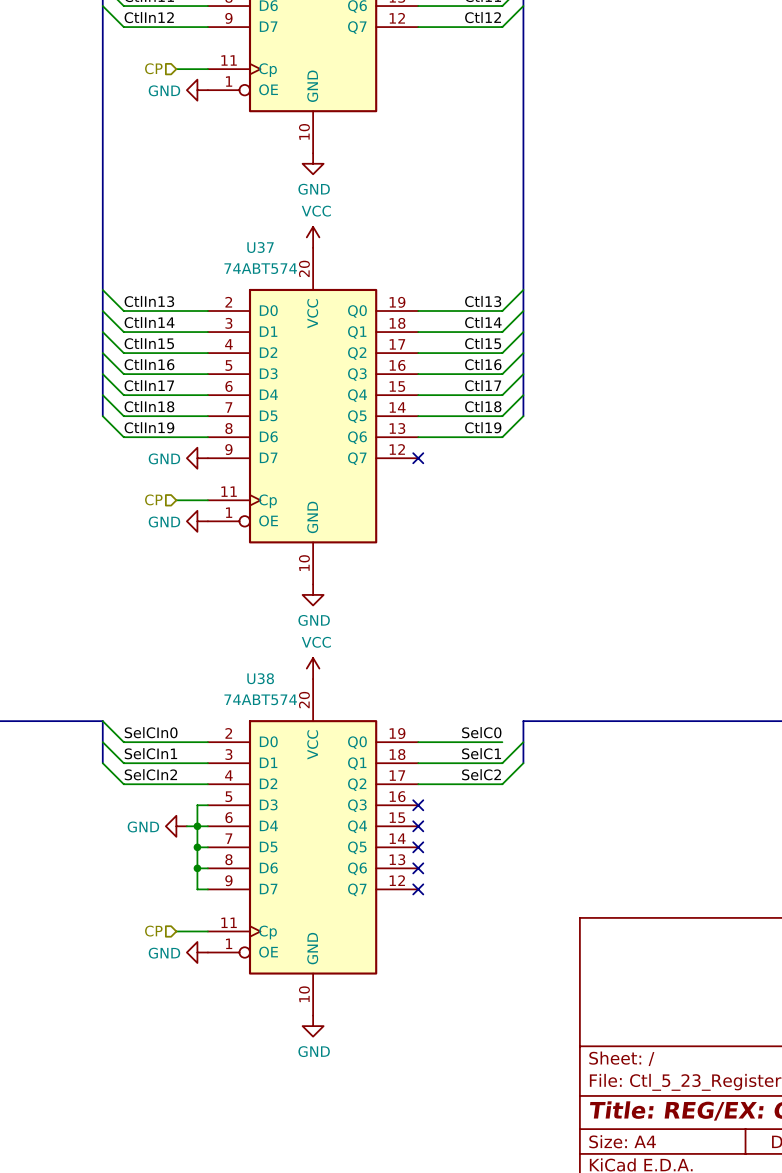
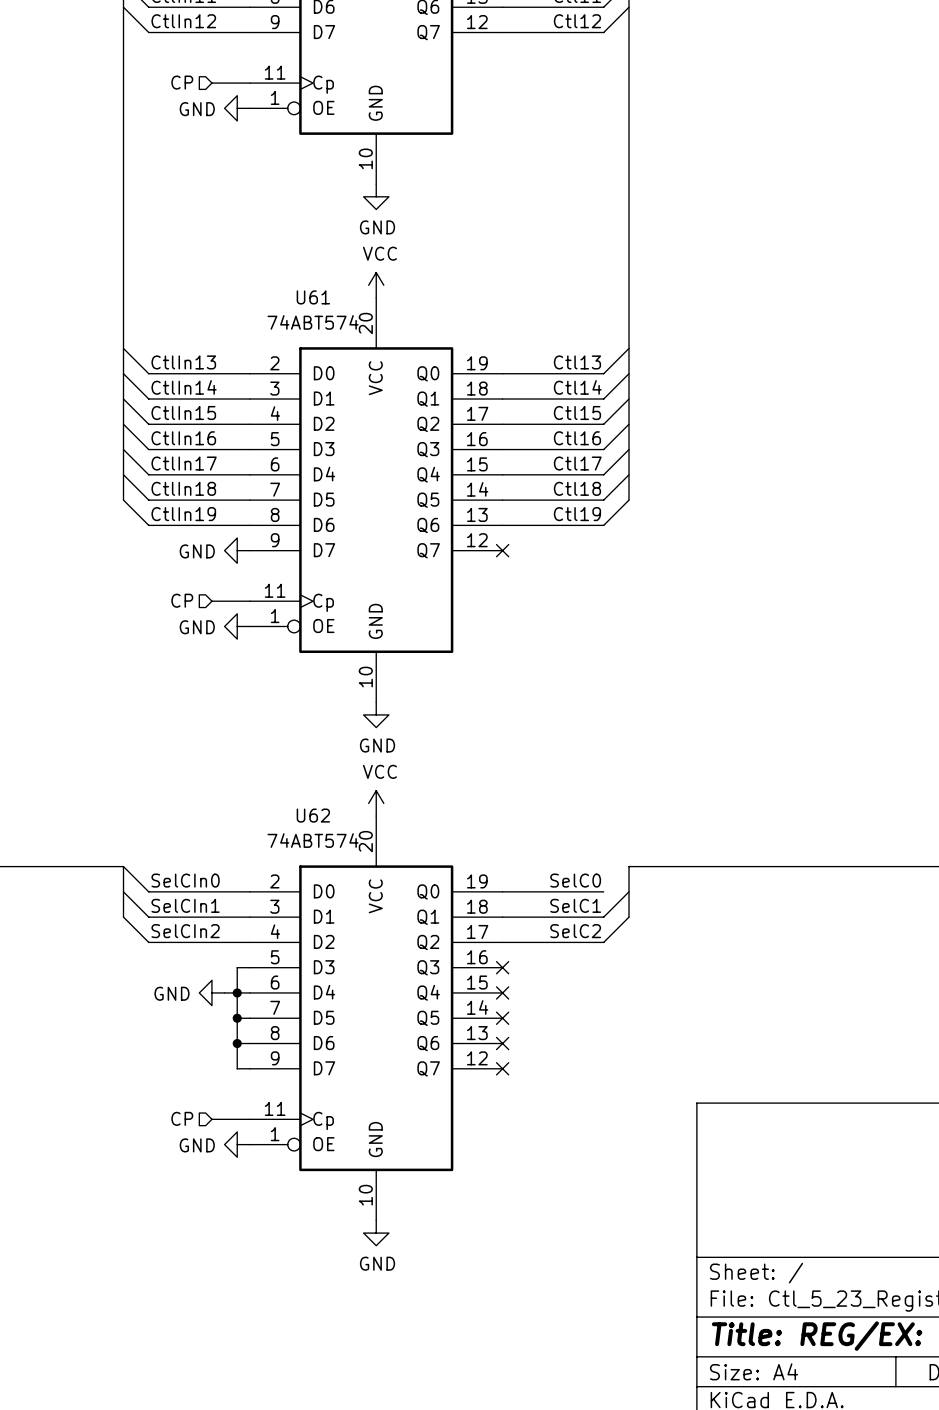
U37 name: U37 (260, 247) -> U61 (313, 297)
U38 name: U38 (260, 678) -> U62 (313, 815)

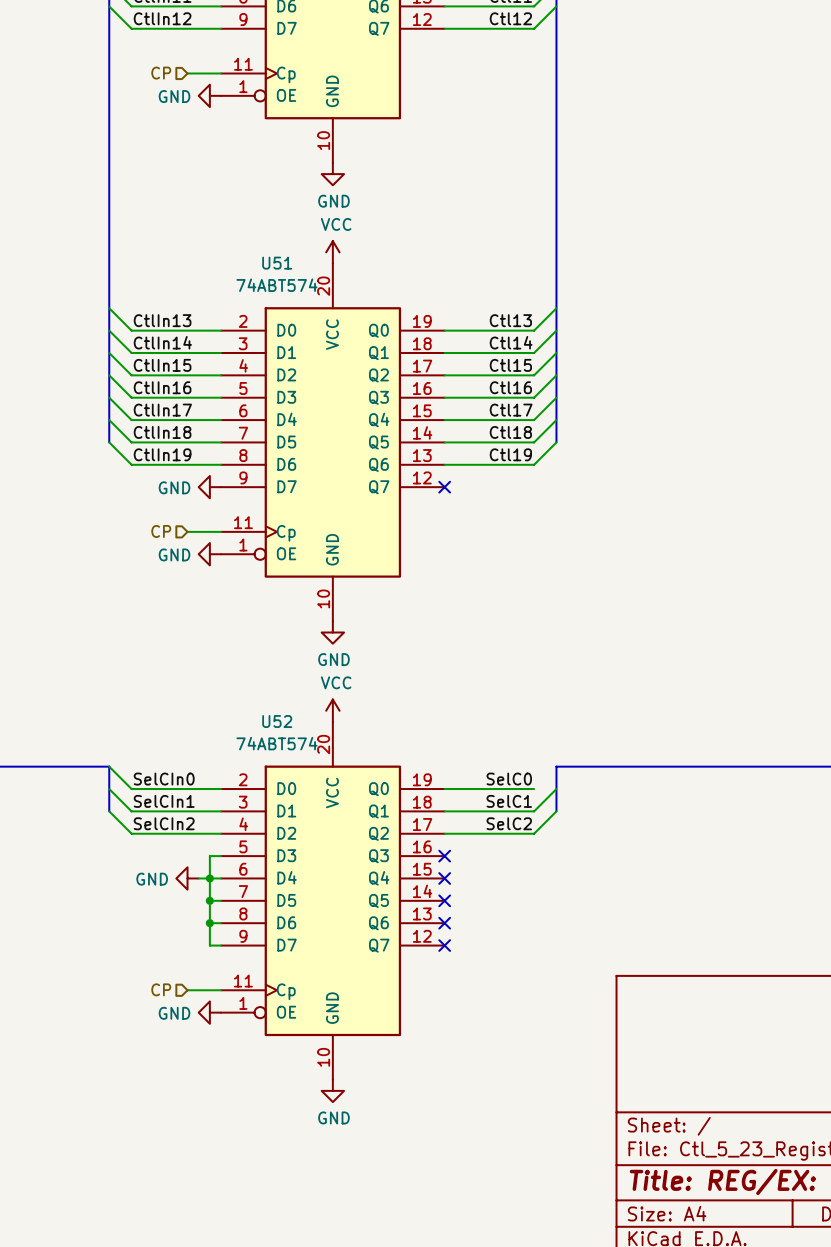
U61 name: U61 (313, 297) -> U51 (277, 263)
U62 name: U62 (313, 815) -> U52 (277, 721)

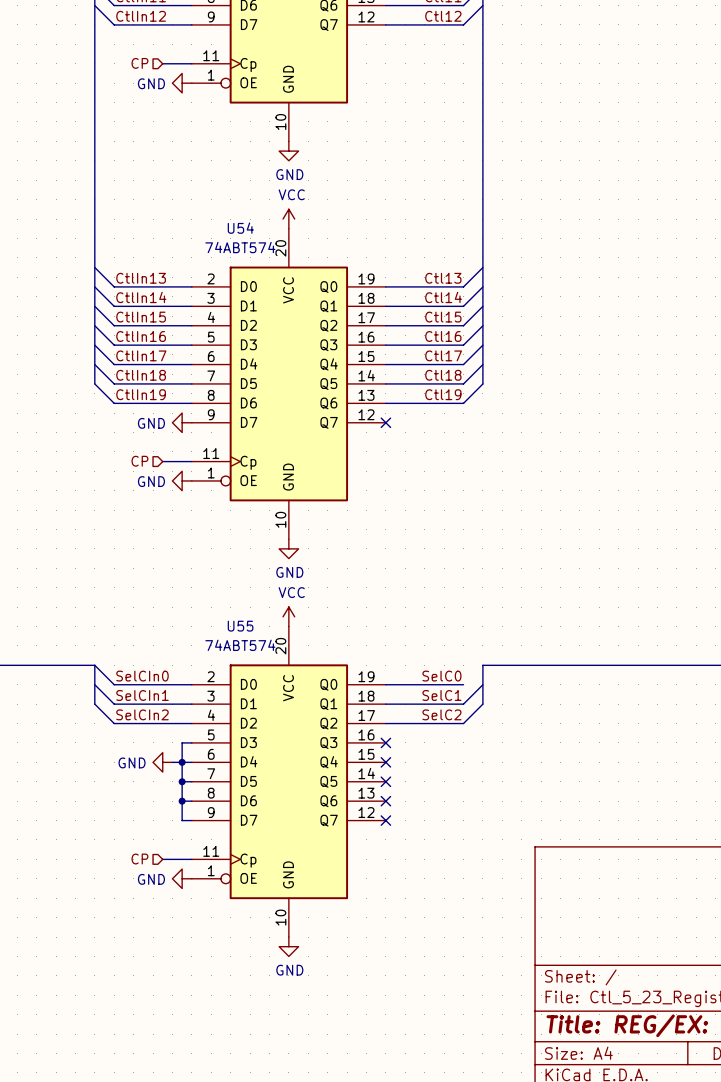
U51 name: U51 (277, 263) -> U54 (240, 228)
U52 name: U52 (277, 721) -> U55 (240, 626)

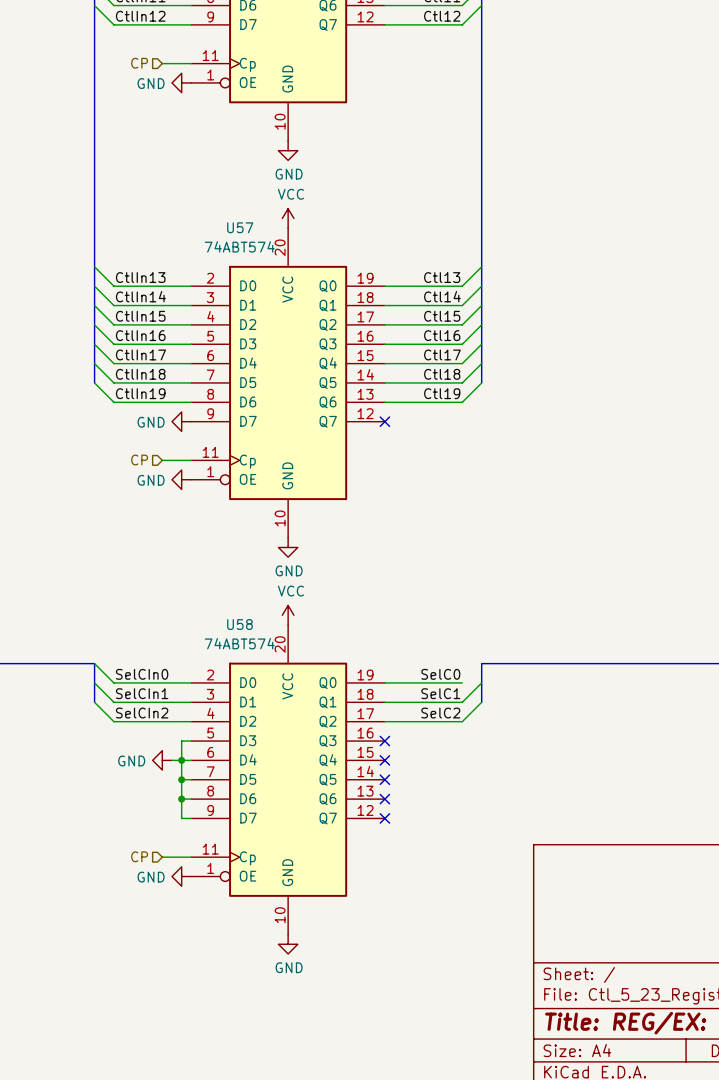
U54 name: U54 (240, 228) -> U57 (240, 227)
U55 name: U55 (240, 626) -> U58 (239, 624)

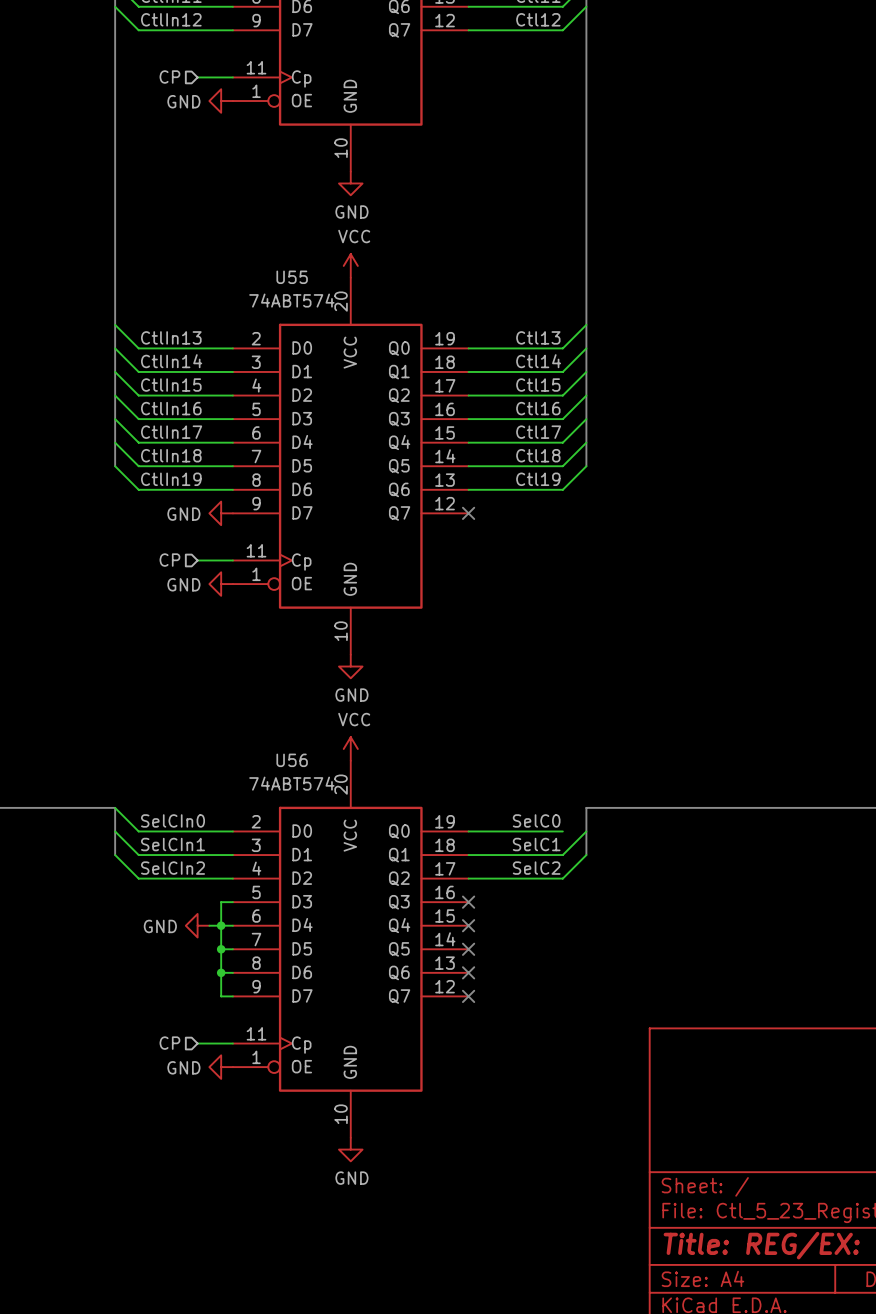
U57 name: U57 (240, 227) -> U55 (292, 277)
U58 name: U58 (239, 624) -> U56 (292, 760)

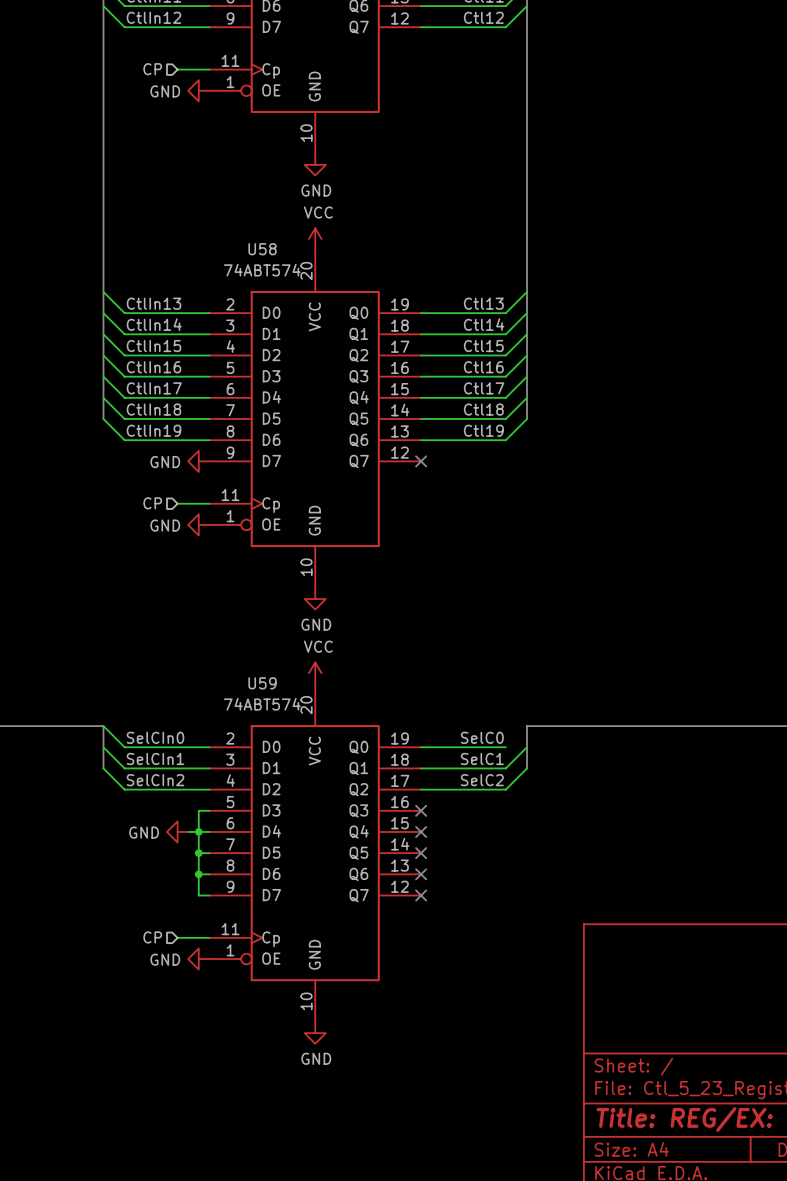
U55 name: U55 (292, 277) -> U58 (262, 249)
U56 name: U56 (292, 760) -> U59 (262, 683)

